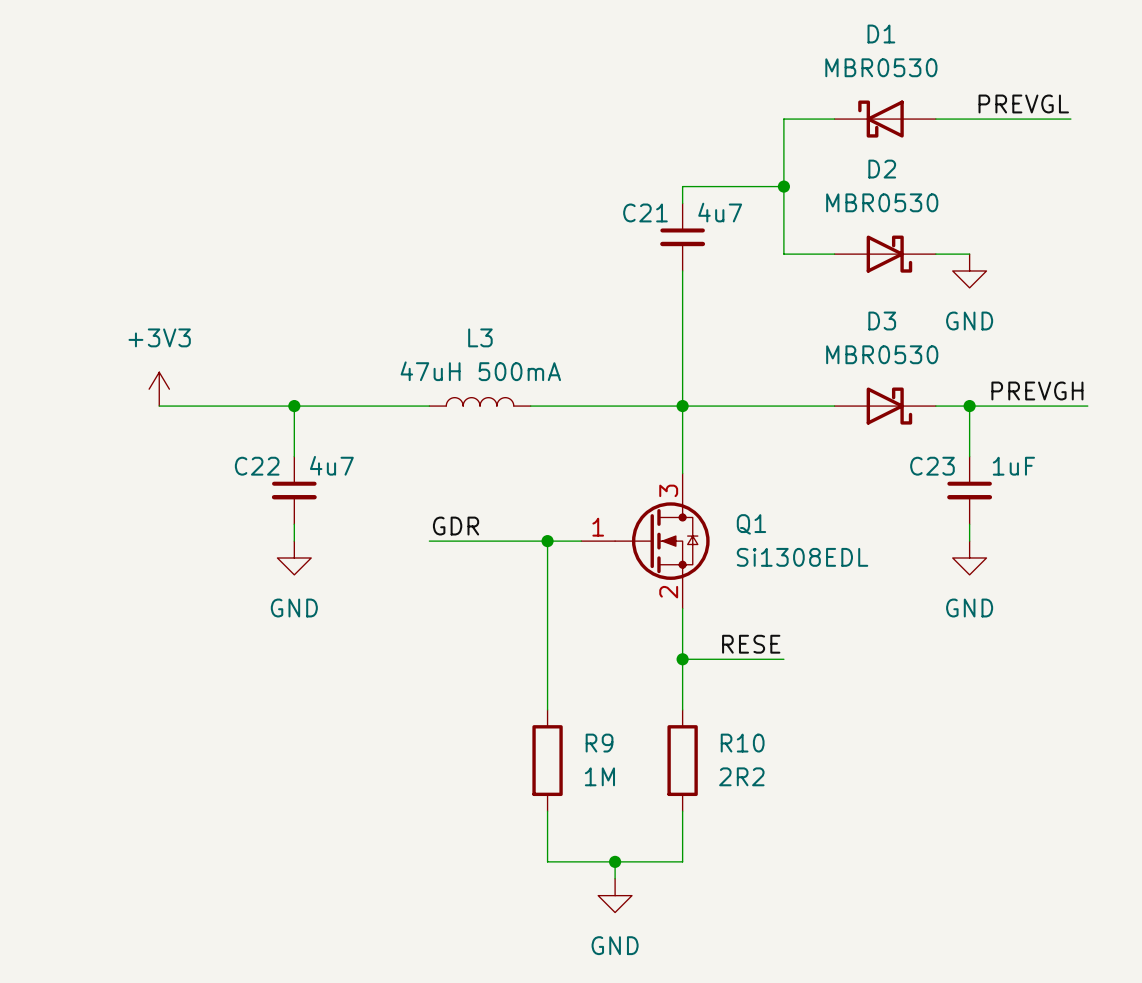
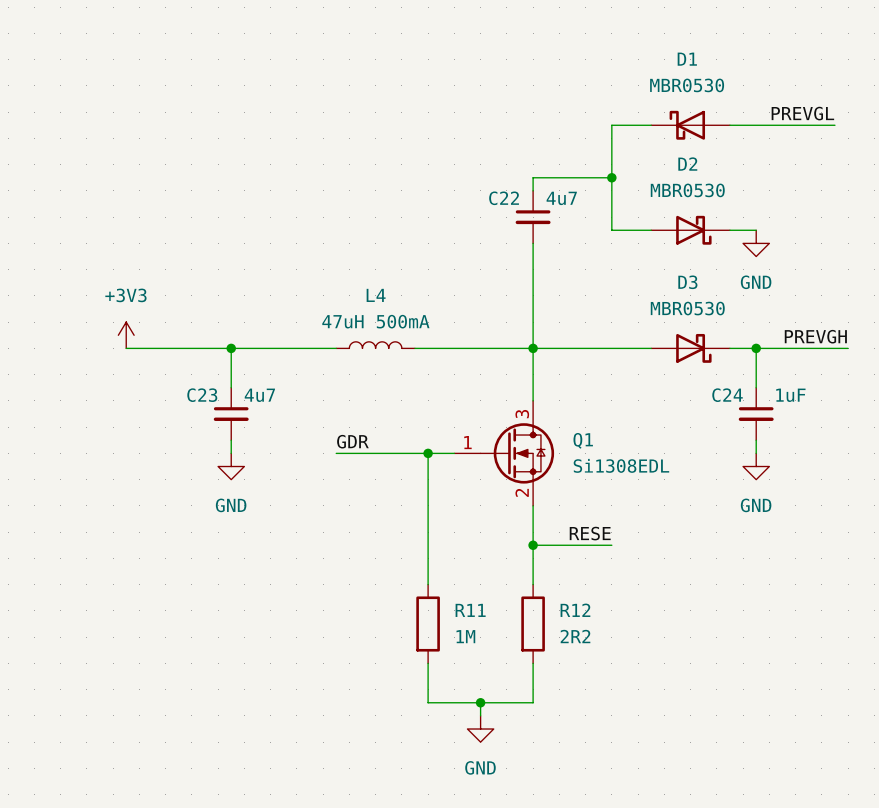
C21 name: C21 (645, 212) -> C22 (504, 198)
L3 name: L3 (480, 337) -> L4 (376, 295)
C22 name: C22 (257, 466) -> C23 (202, 395)
C23 name: C23 (932, 466) -> C24 (727, 395)
R9 name: R9 (599, 743) -> R11 (470, 610)
R10 name: R10 (742, 743) -> R12 (575, 610)

